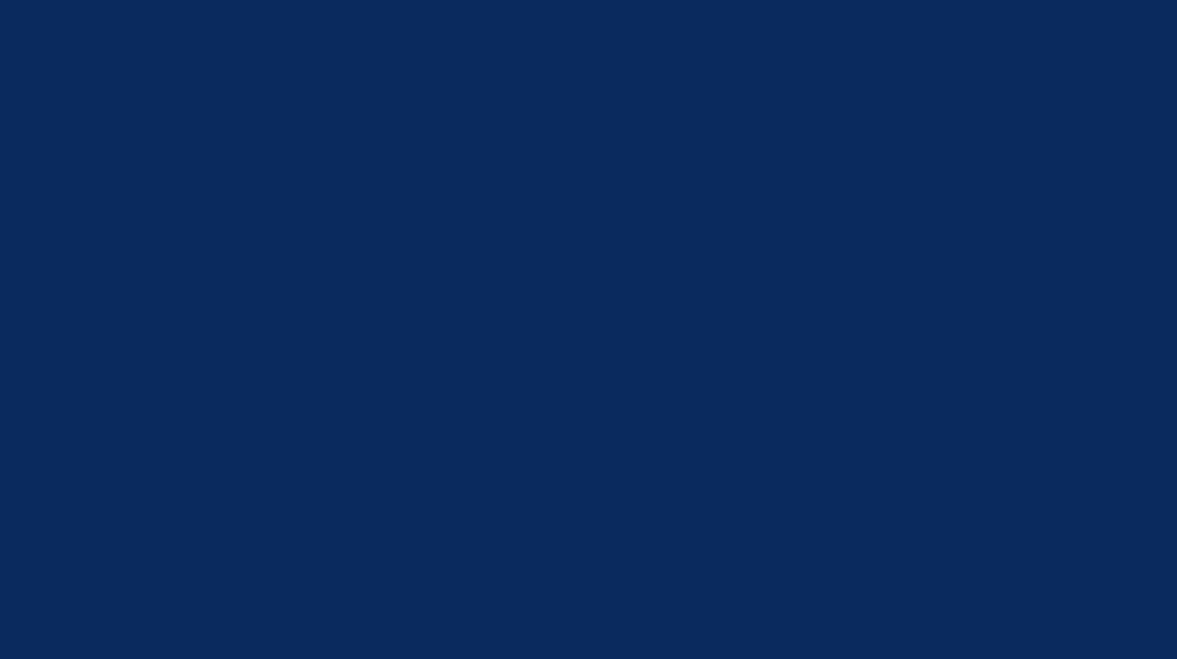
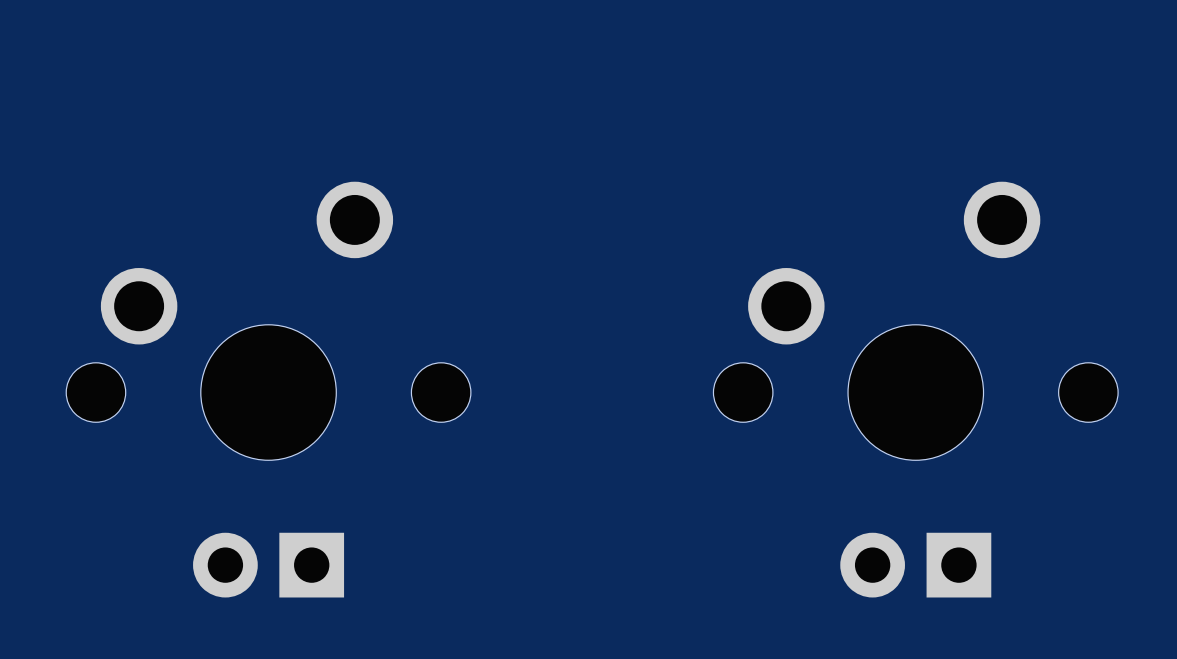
part: none -> (268, 389)
part: none -> (915, 389)

